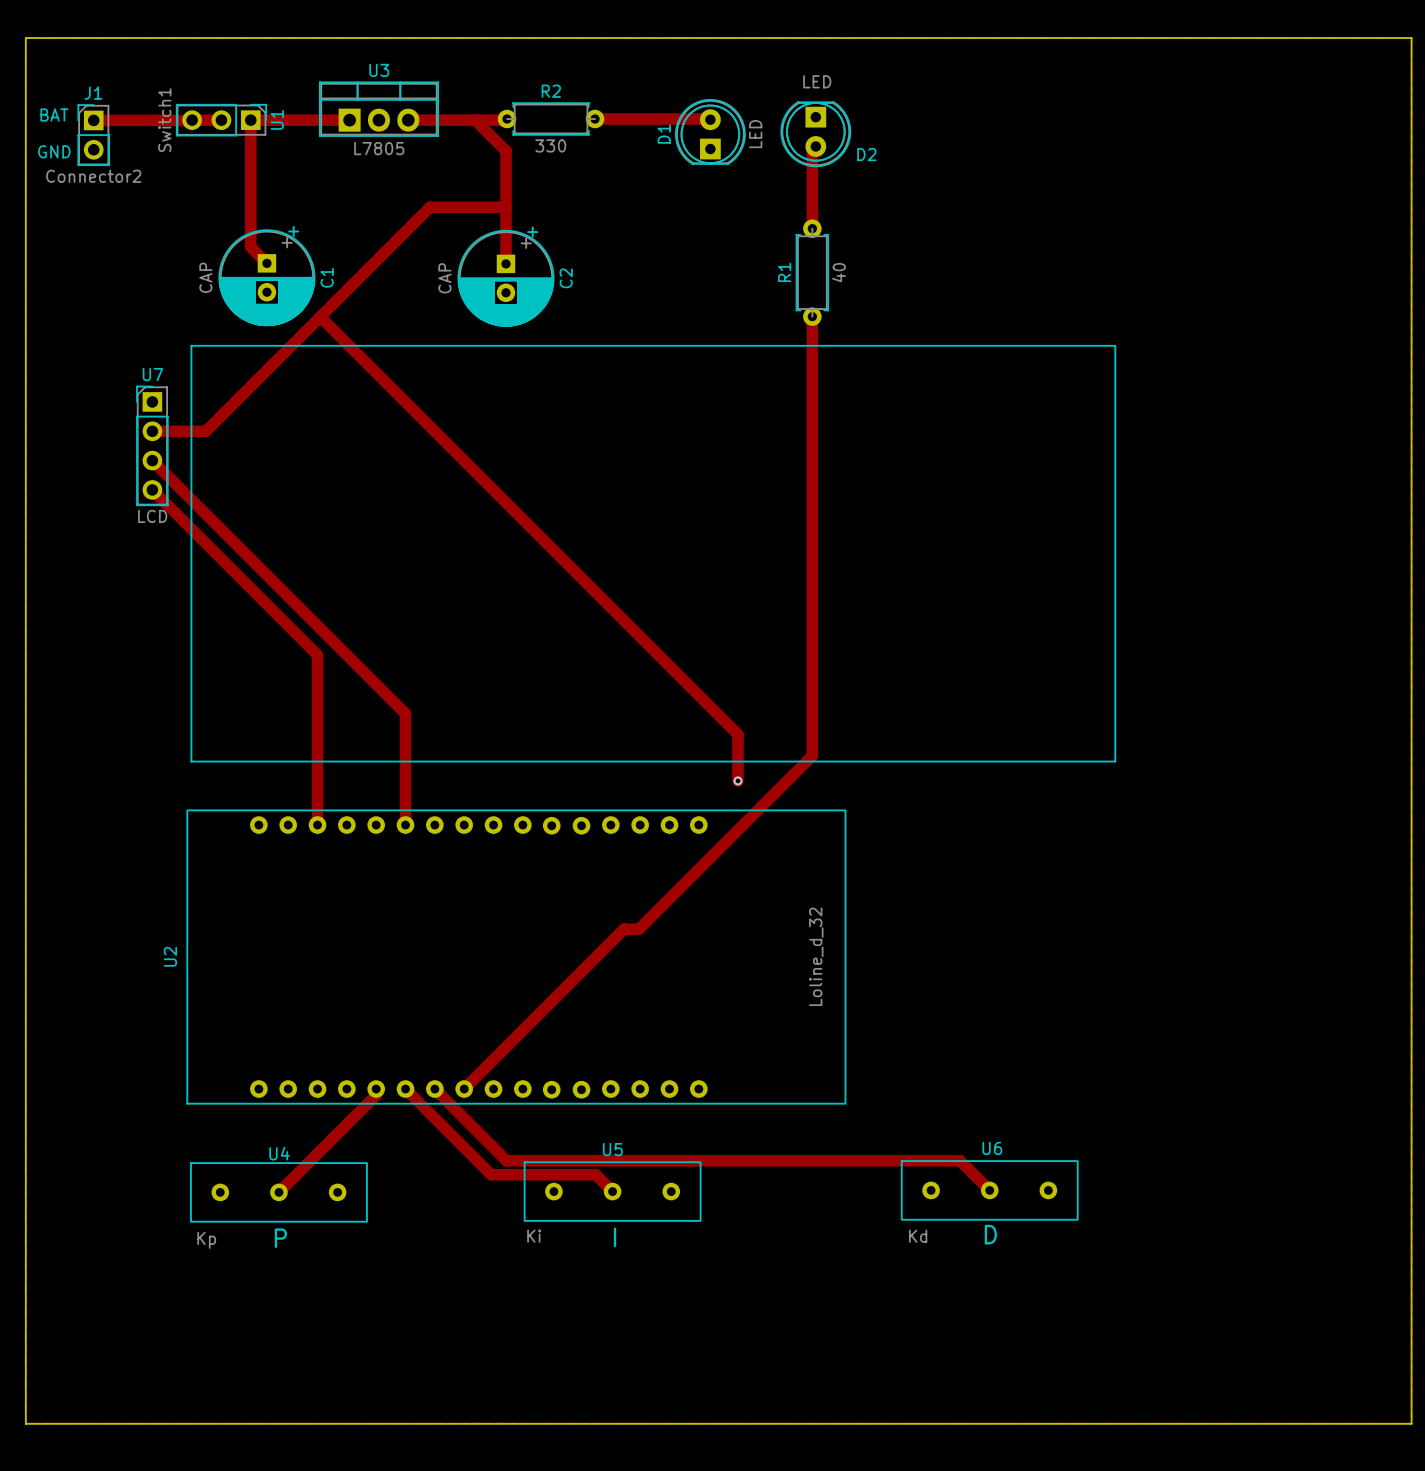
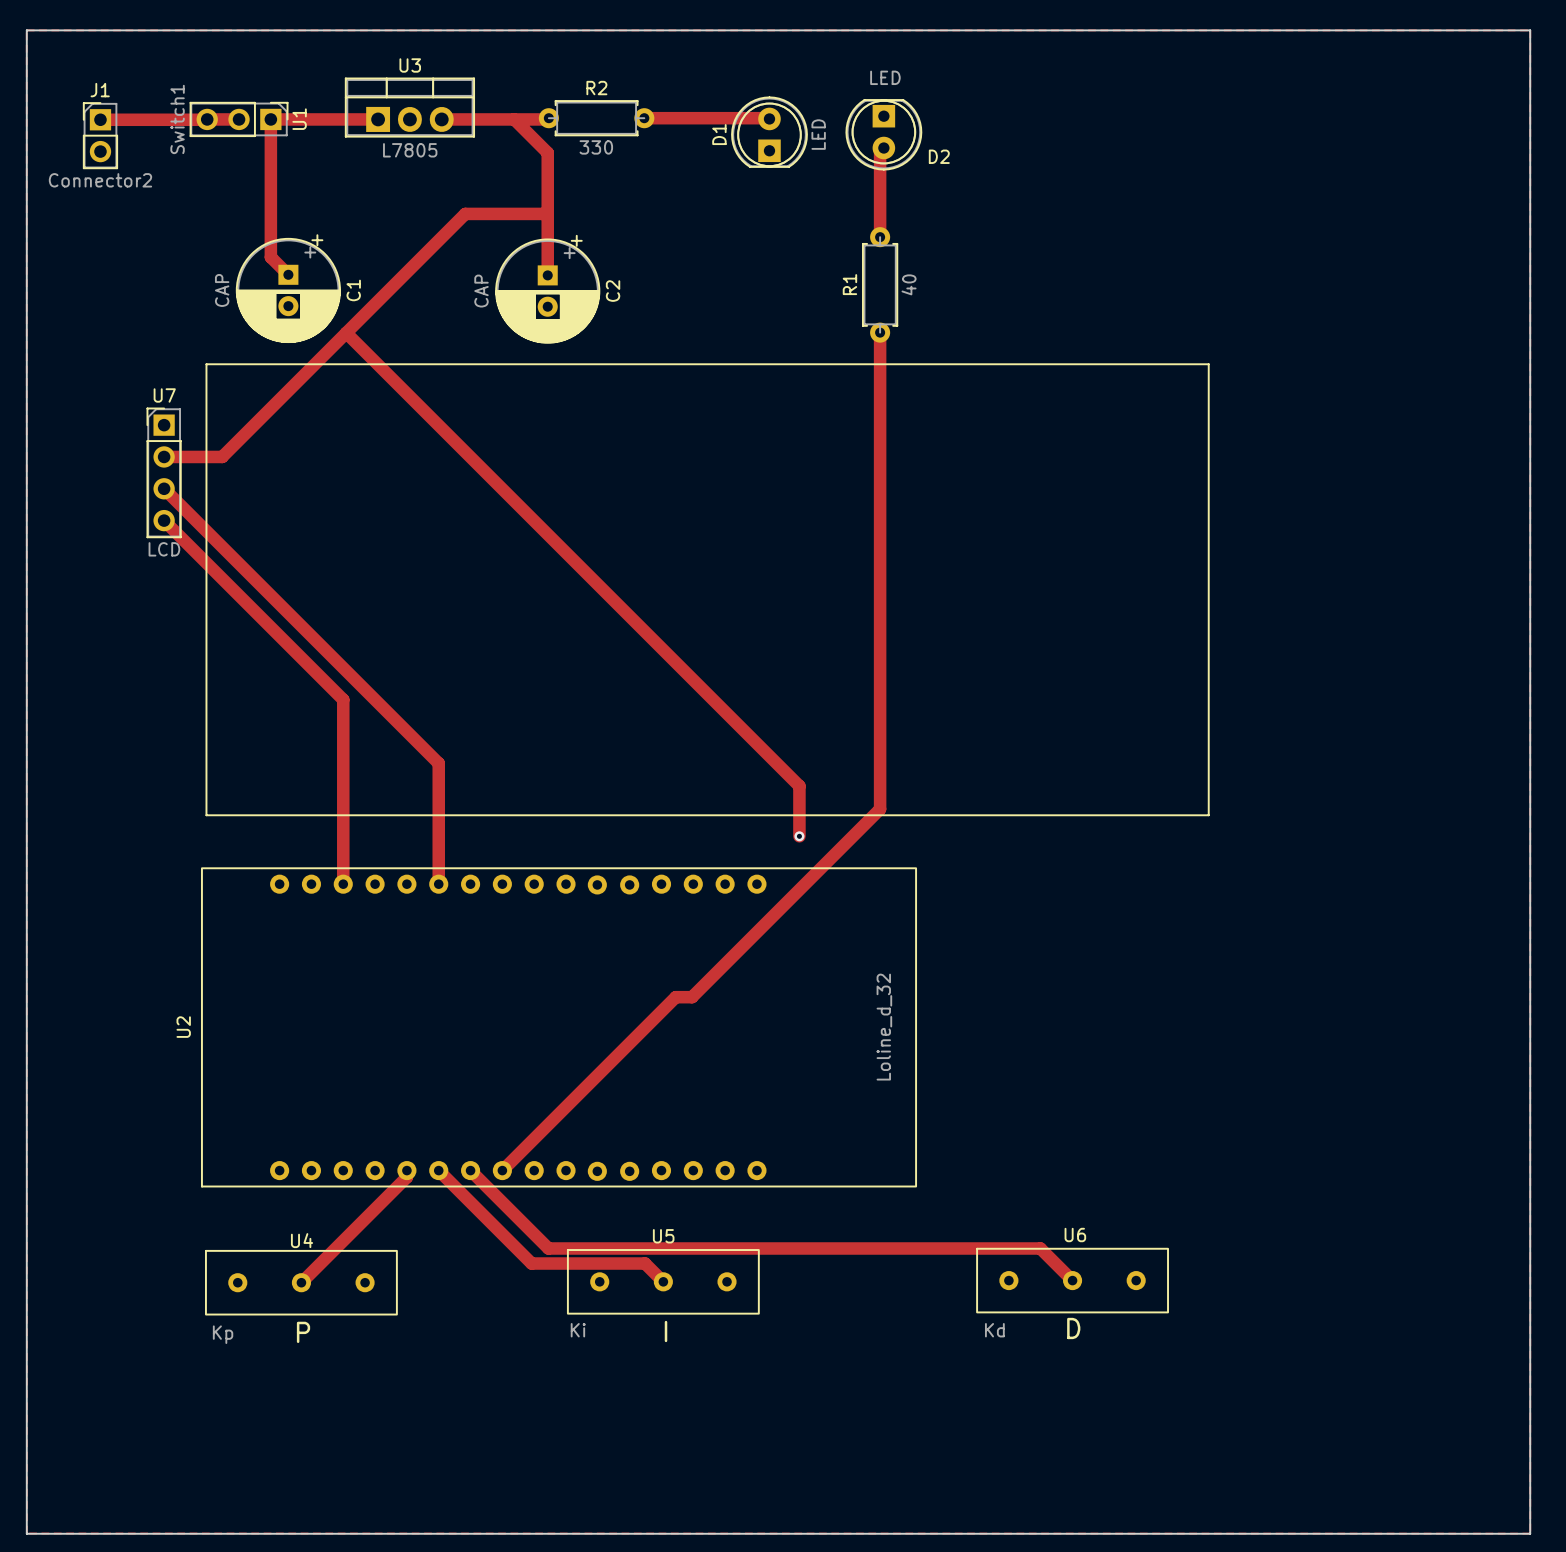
text: BAT (54, 114) -> none
text: GND (54, 151) -> none

